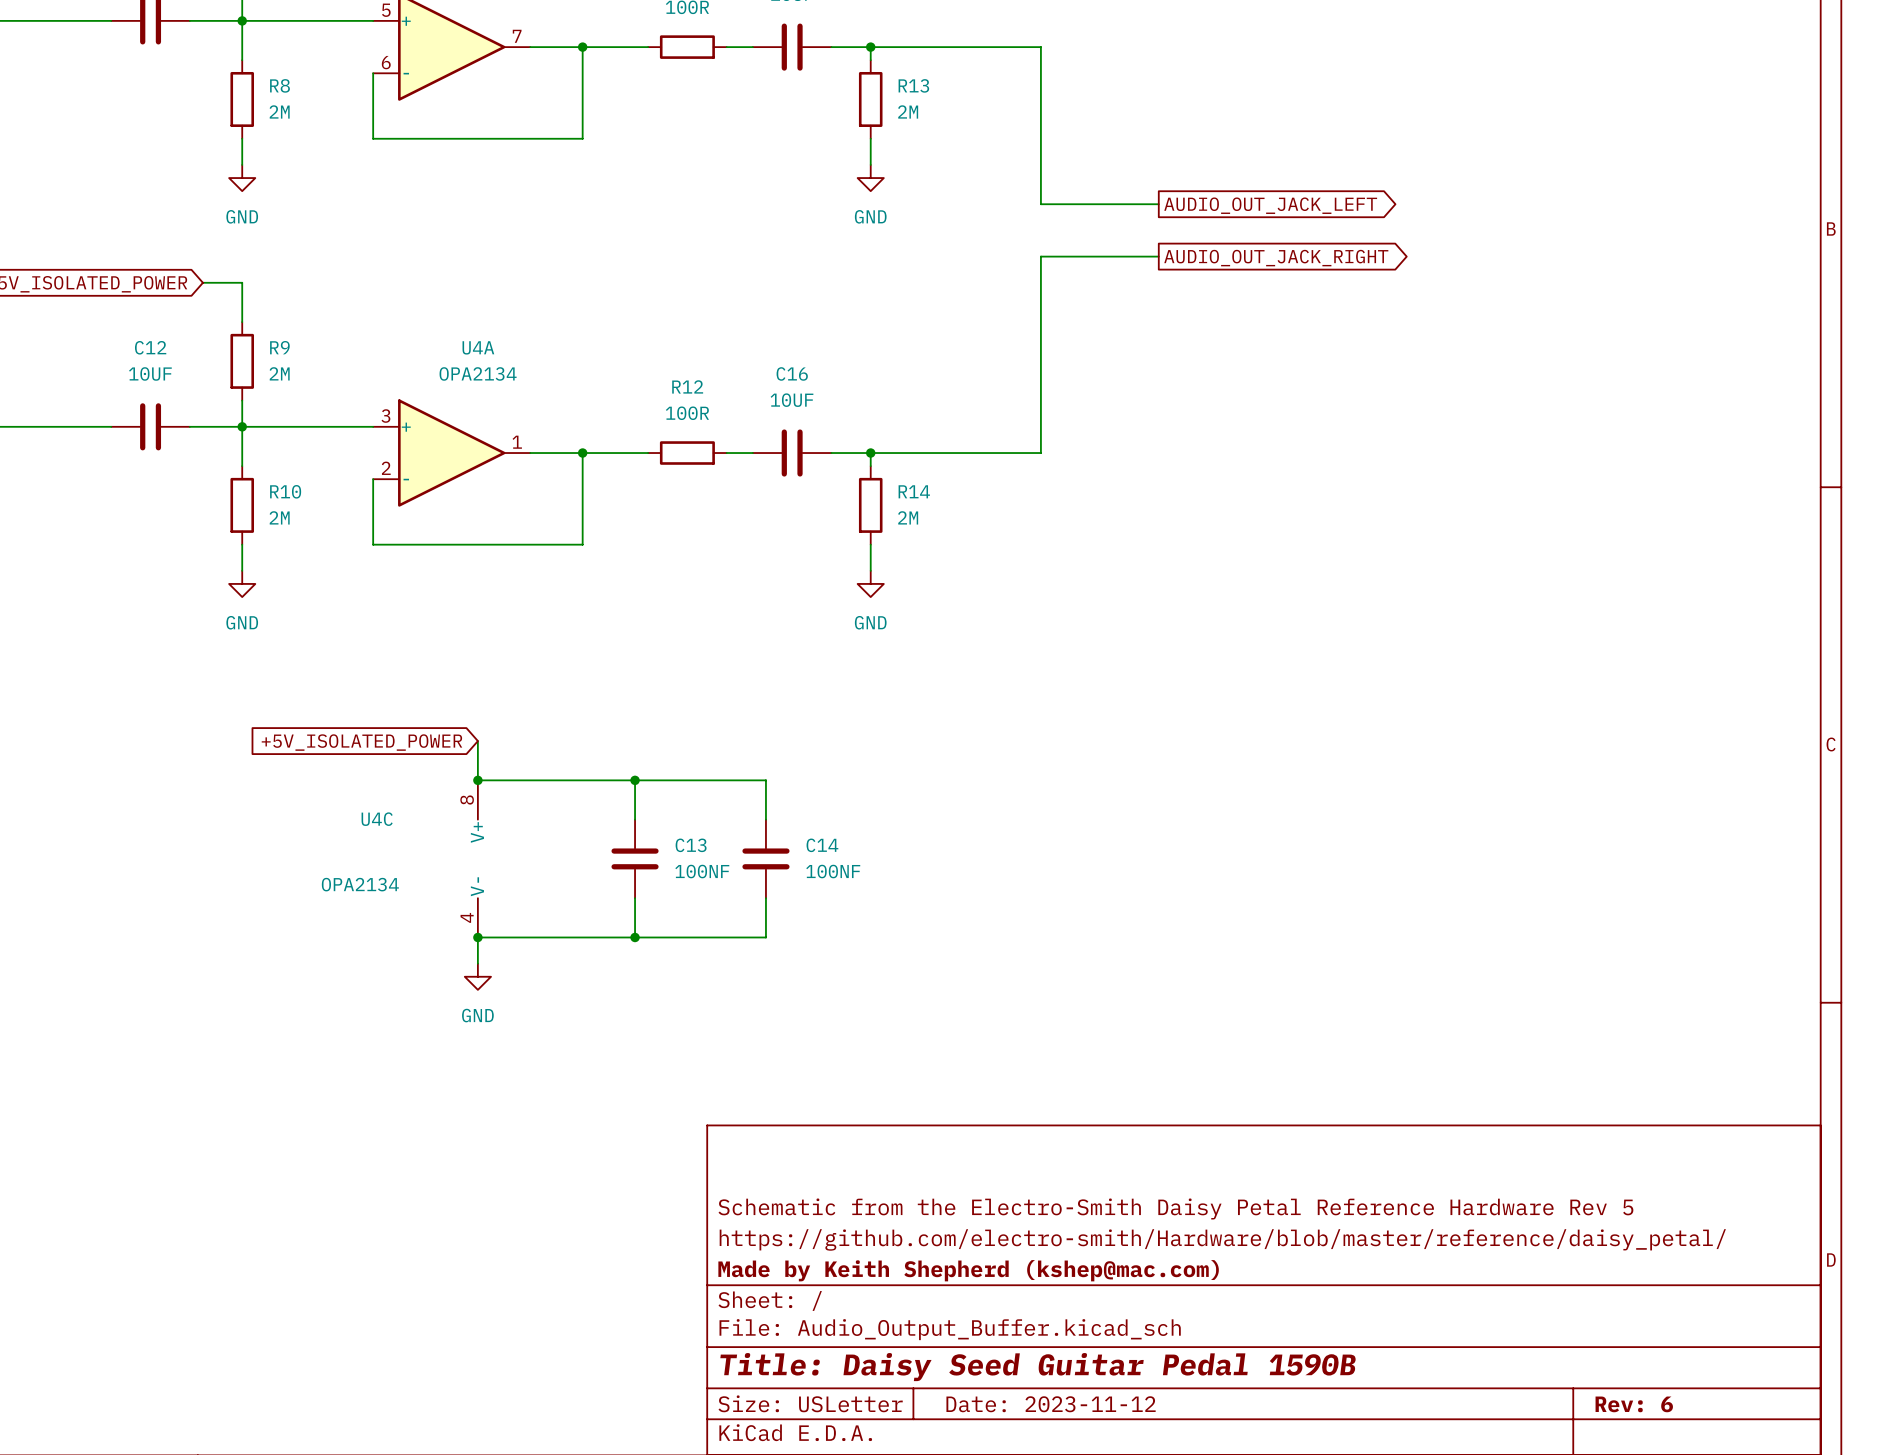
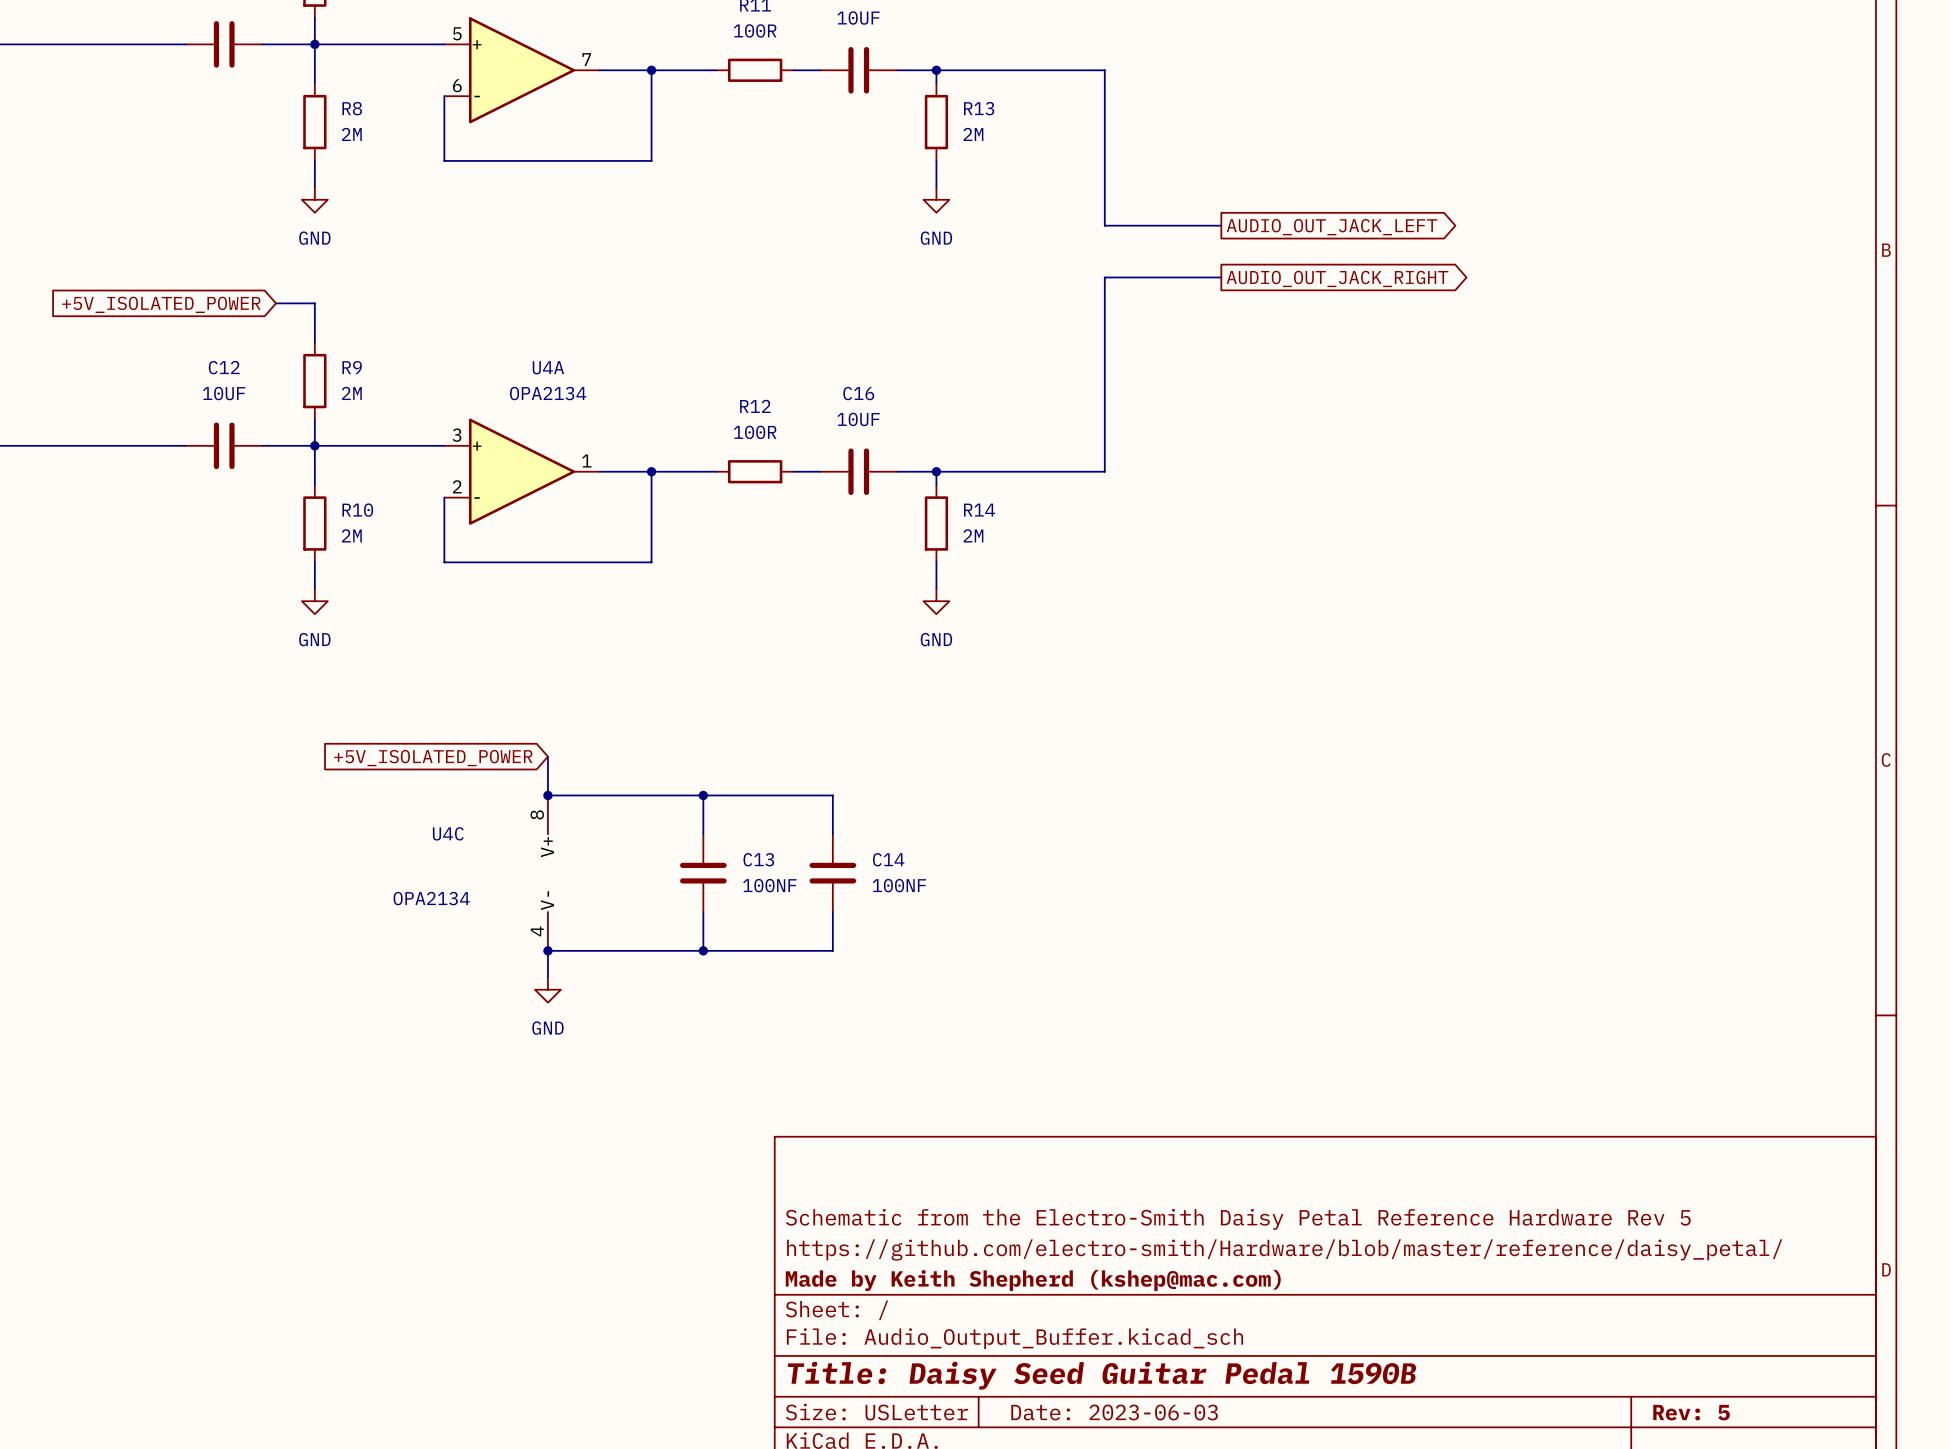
title block: Date: 2023-11-12 (1051, 1404) -> Date: 2023-06-03 (1114, 1412)
title block: Rev: 6 (1634, 1404) -> Rev: 5 (1691, 1412)

